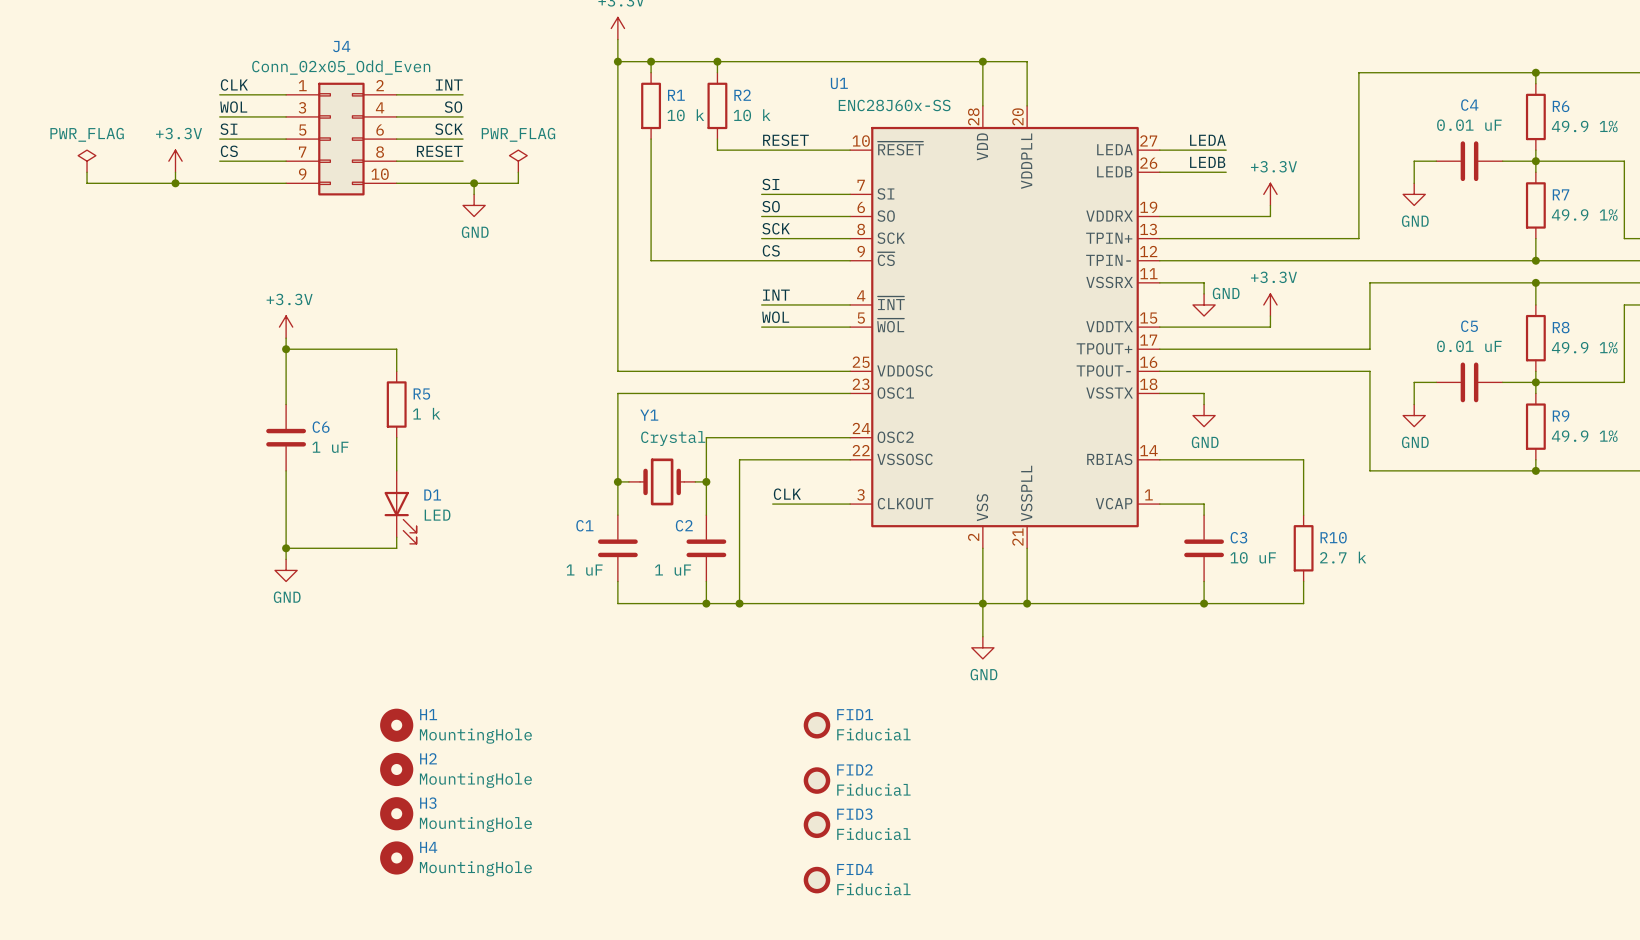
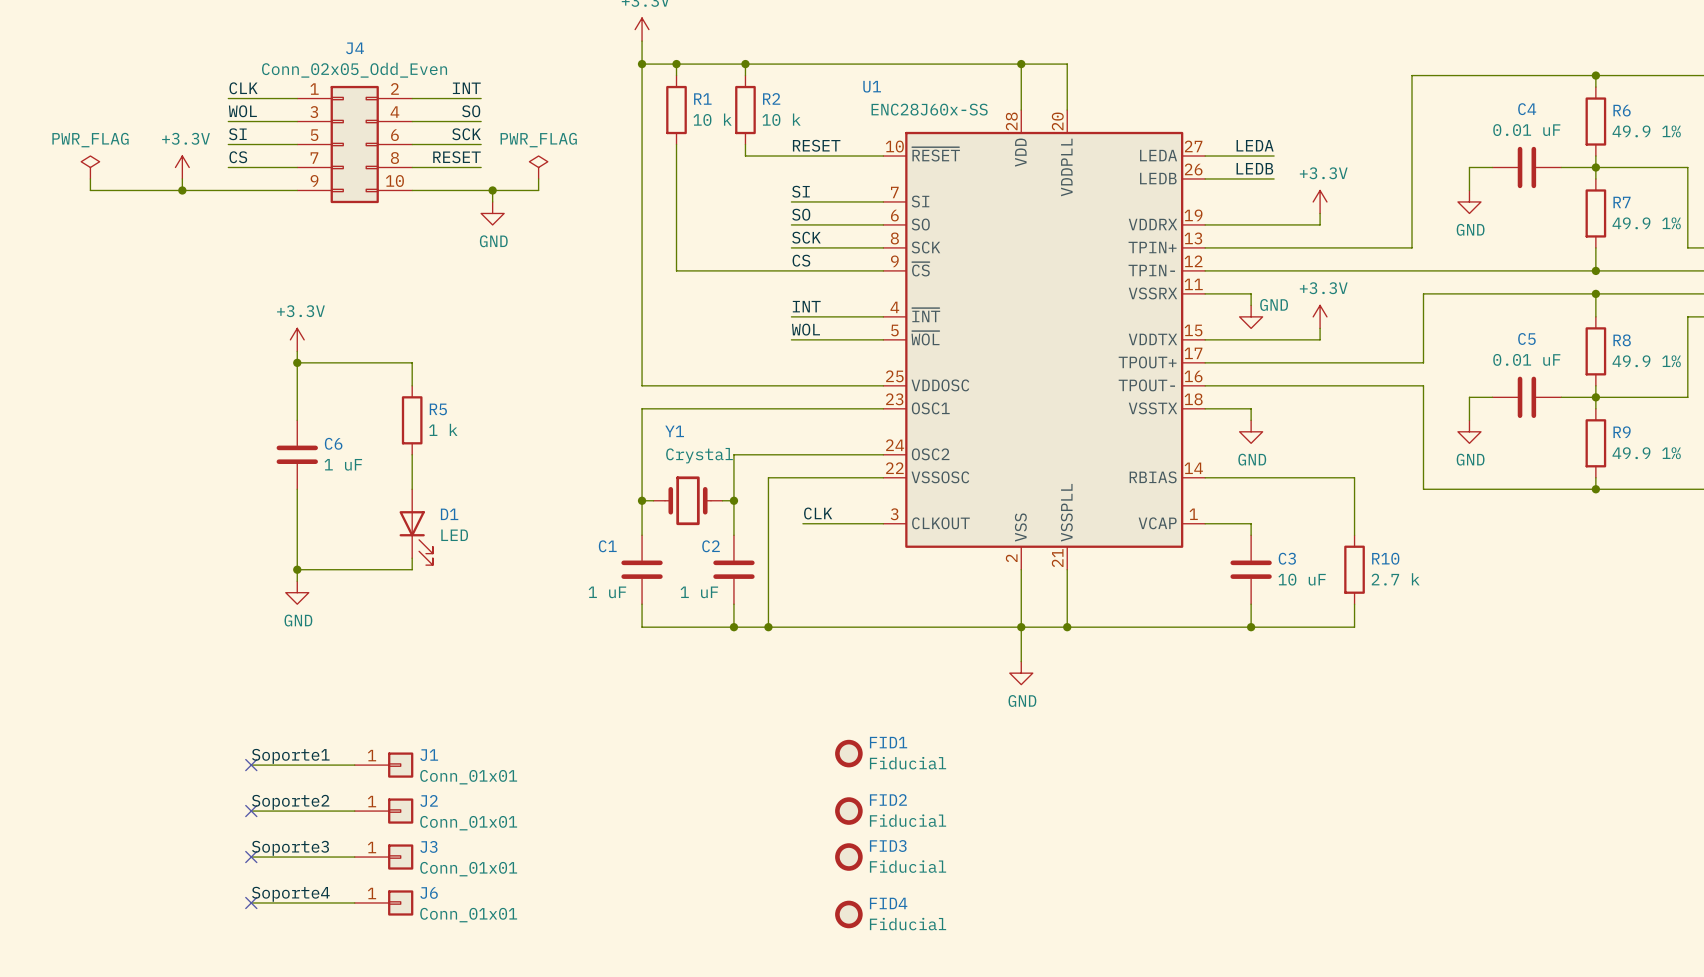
H1: MountingHole (396, 725) -> none
label: none -> Soporte1 (290, 756)
wire: none -> (251, 765) (354, 765)
no-connect mark: none -> (251, 765)
J1: none -> Conn_01x01 (384, 765)
H2: MountingHole (396, 769) -> none
label: none -> Soporte2 (290, 802)
wire: none -> (251, 811) (354, 811)
no-connect mark: none -> (251, 811)
J2: none -> Conn_01x01 (384, 811)
H3: MountingHole (396, 813) -> none
label: none -> Soporte3 (290, 848)
wire: none -> (251, 857) (354, 857)
no-connect mark: none -> (251, 857)
J3: none -> Conn_01x01 (384, 857)
H4: MountingHole (396, 857) -> none
label: none -> Soporte4 (290, 894)
wire: none -> (251, 902) (354, 902)
no-connect mark: none -> (251, 902)
J6: none -> Conn_01x01 (384, 902)

